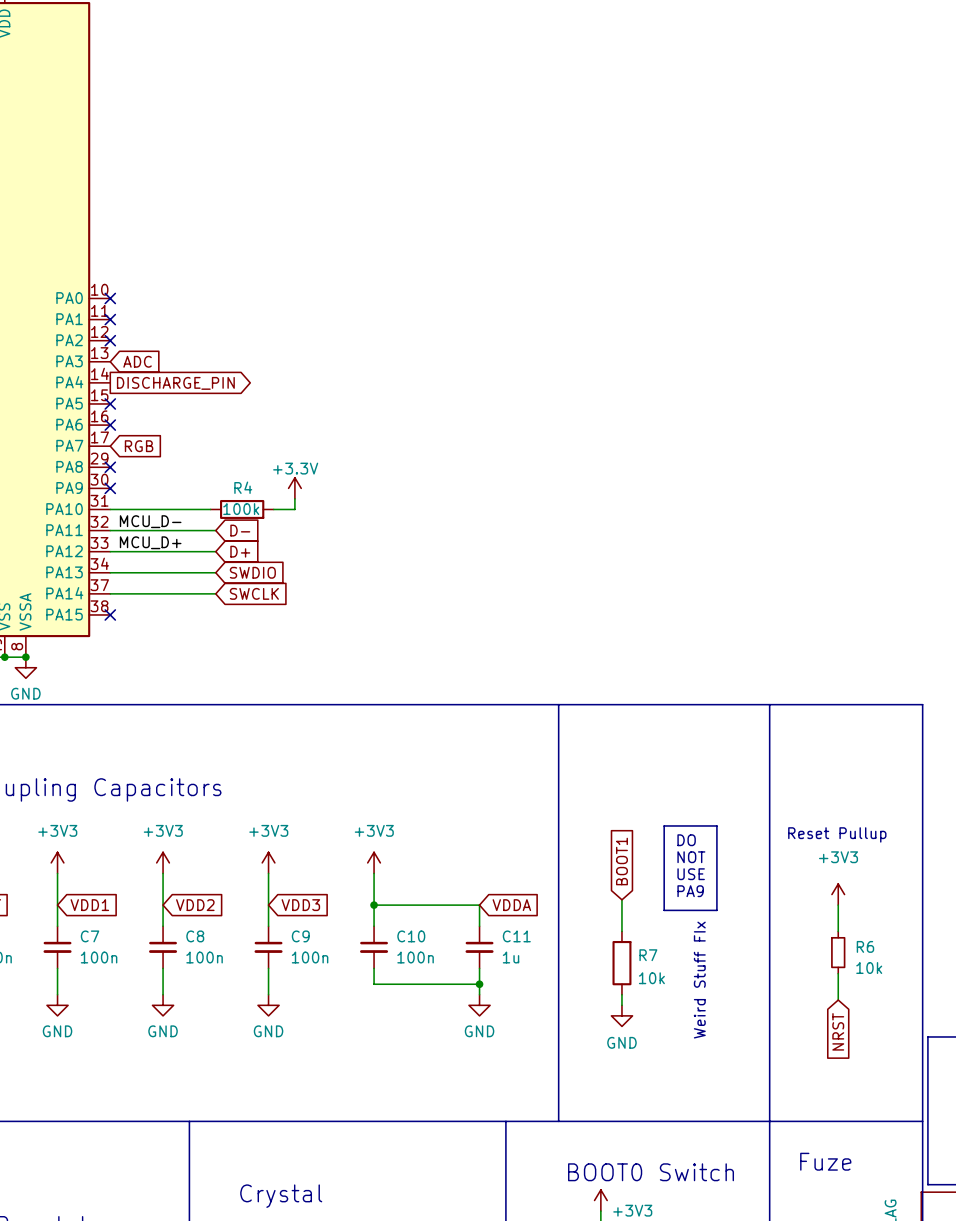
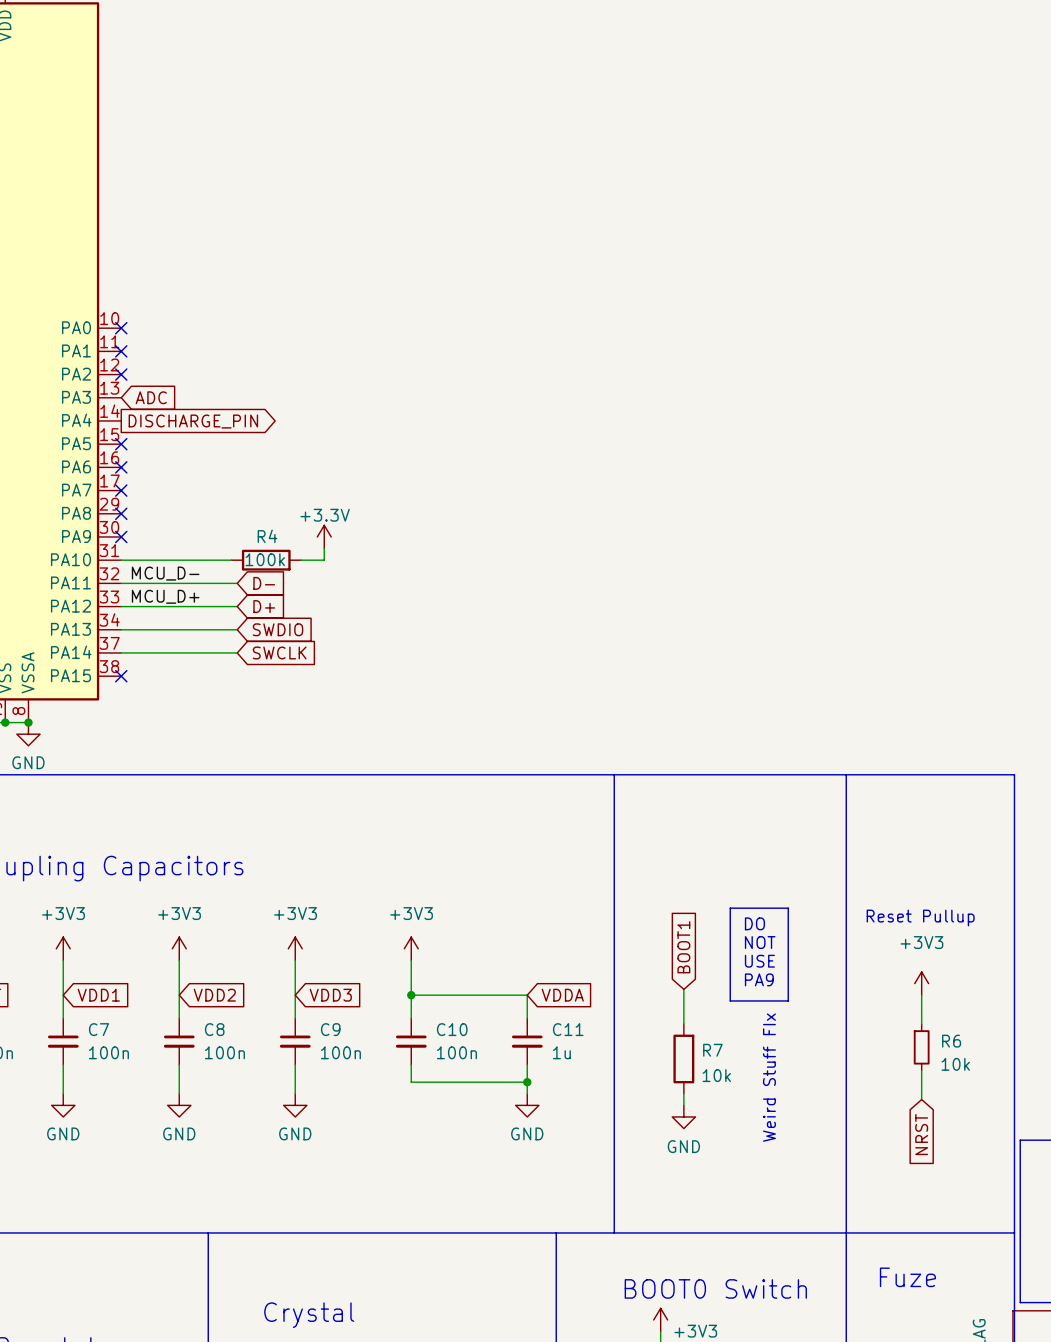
no-connect mark: none -> (121, 490)
global label: RGB (139, 446) -> none

